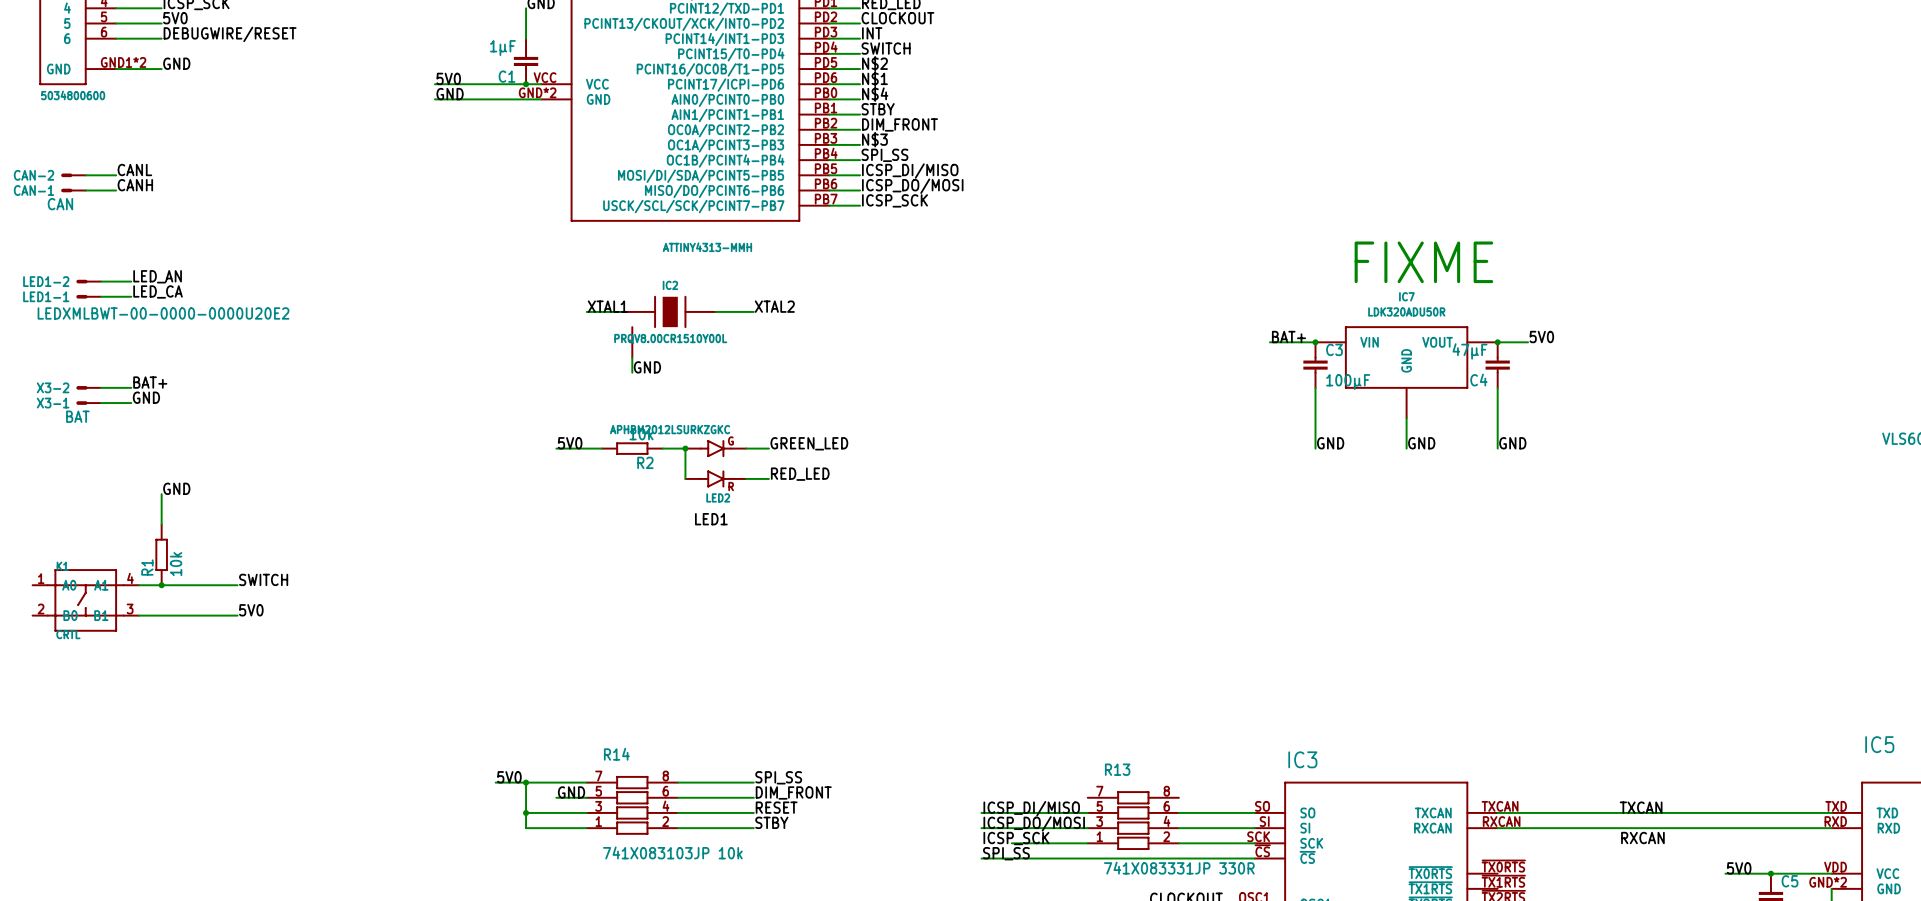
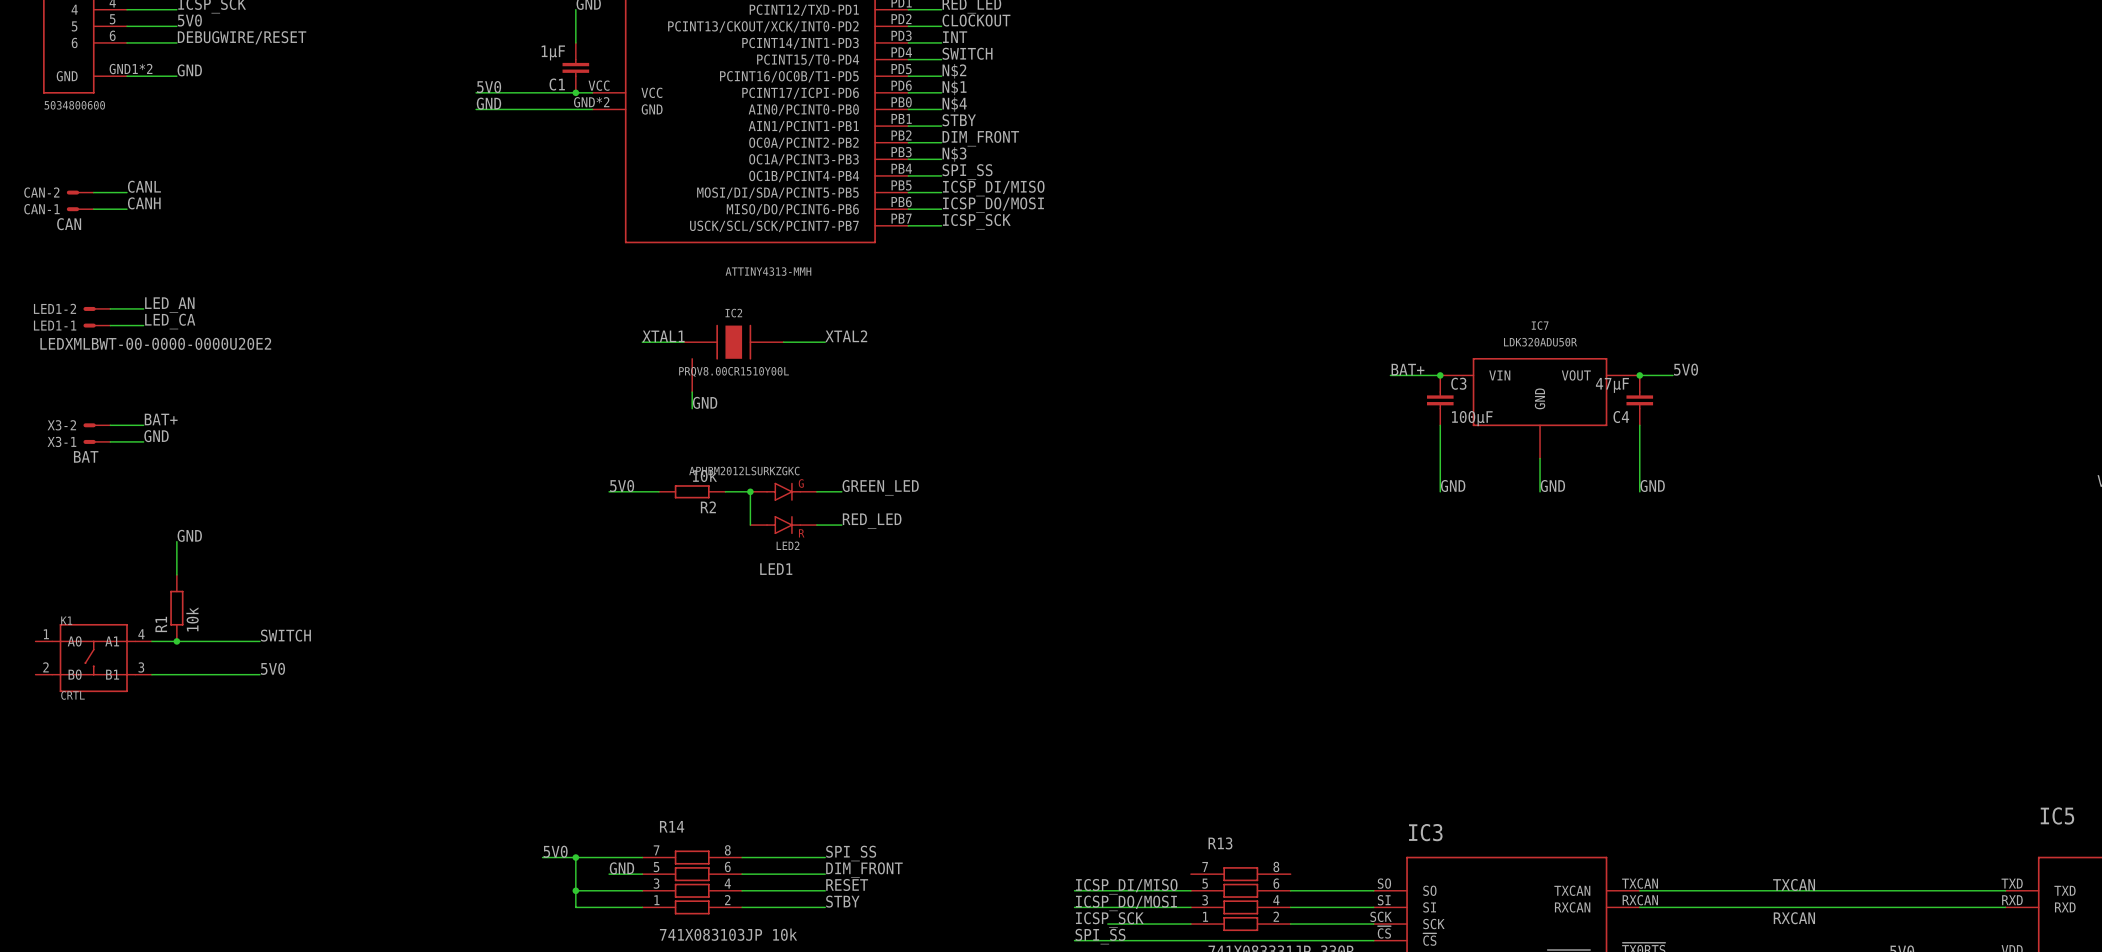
text: FIXME (1423, 262) -> none

